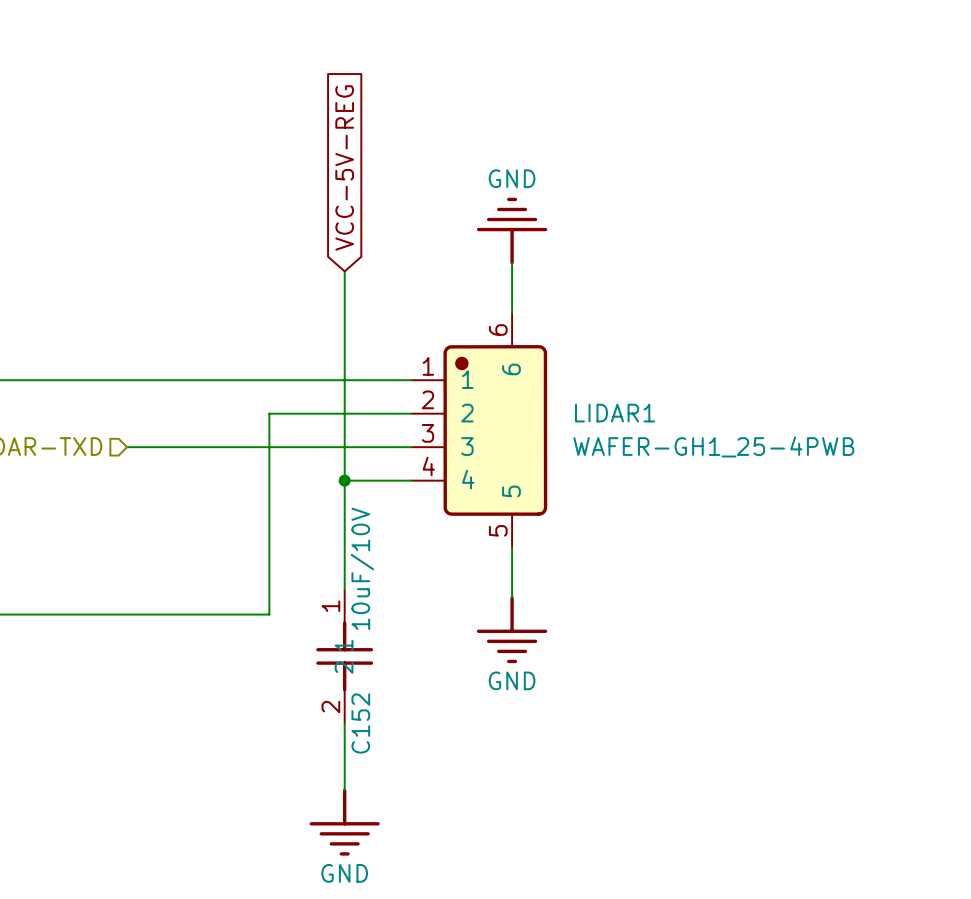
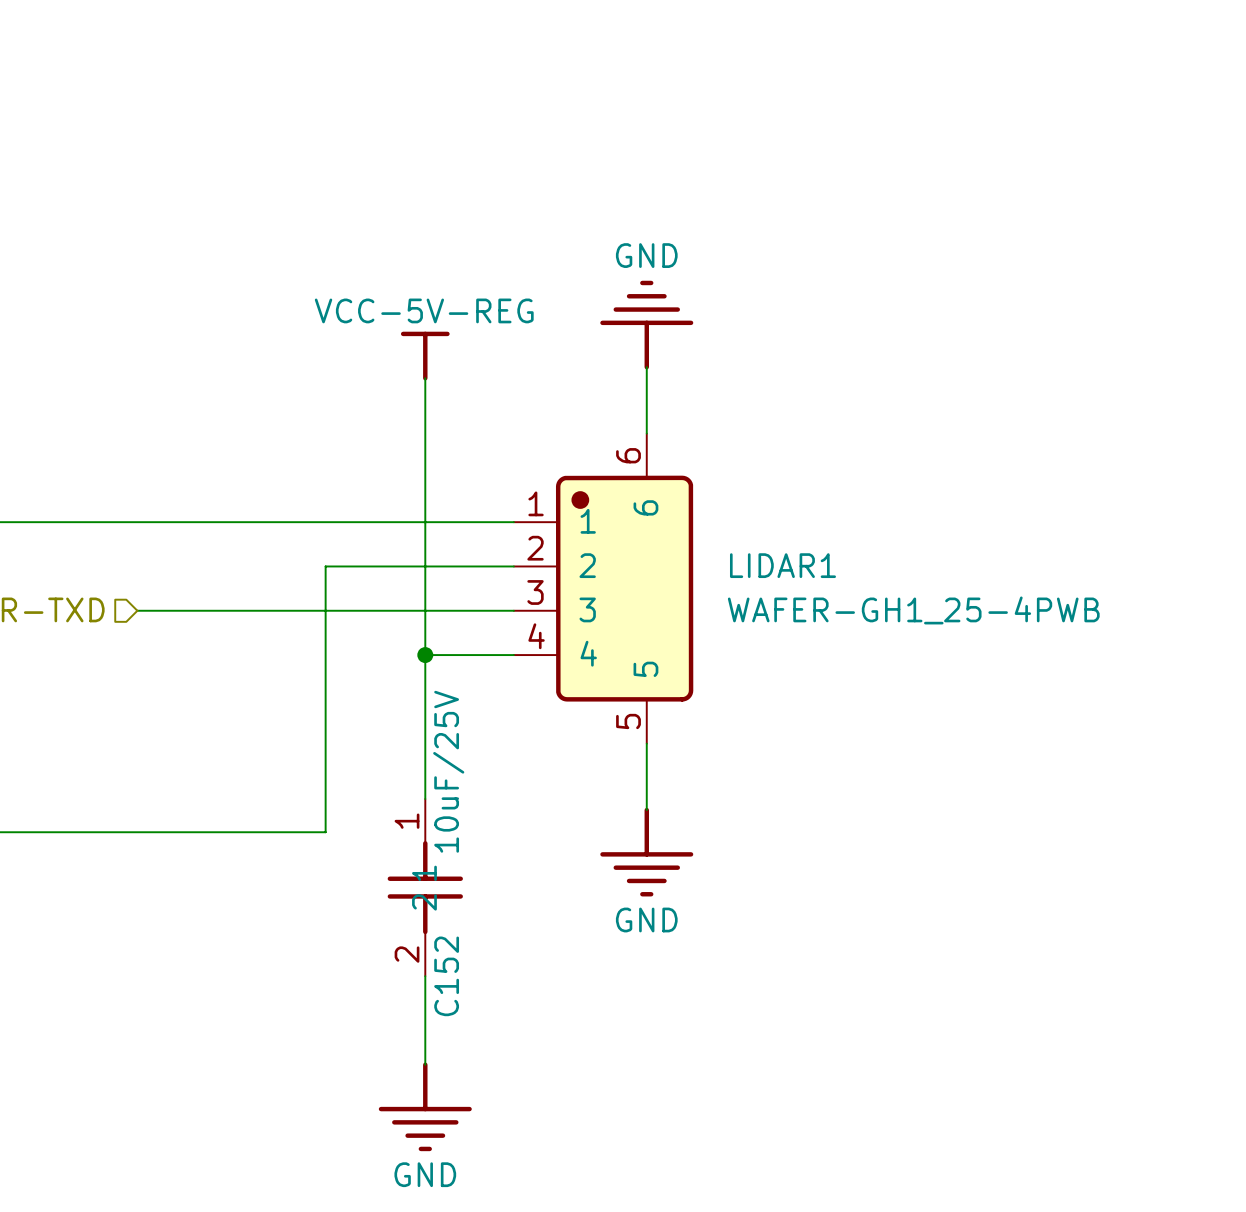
global label: VCC-5V-REG (344, 167) -> none
power symbol: none -> VCC-5V-REG (425, 356)
C152 value: 10uF/10V (362, 568) -> 10uF/25V (448, 771)

